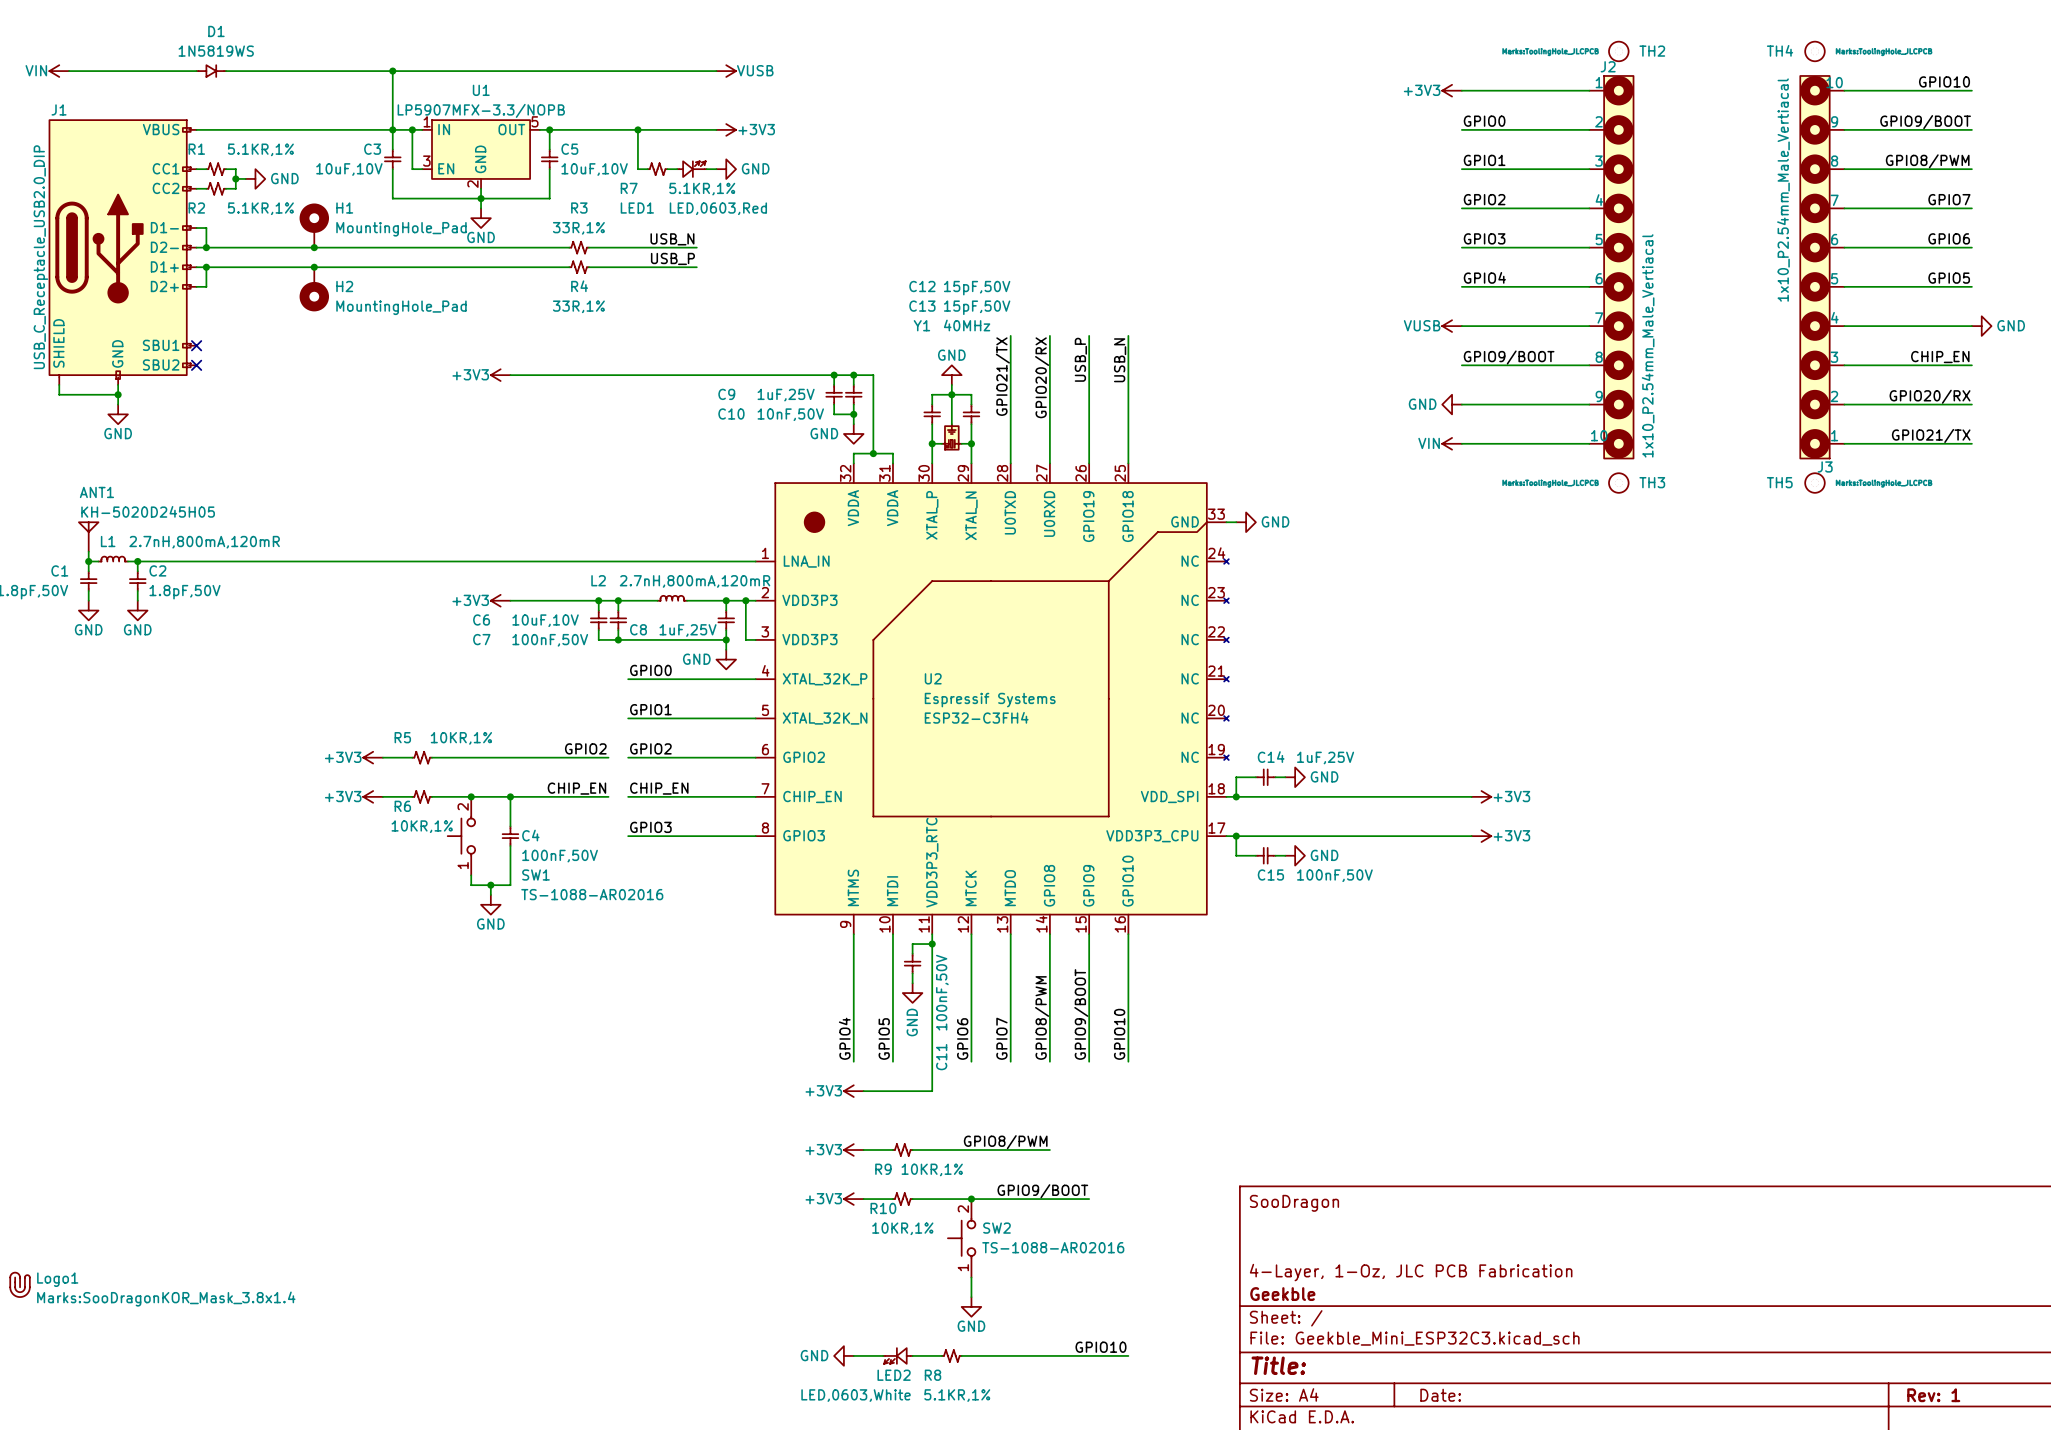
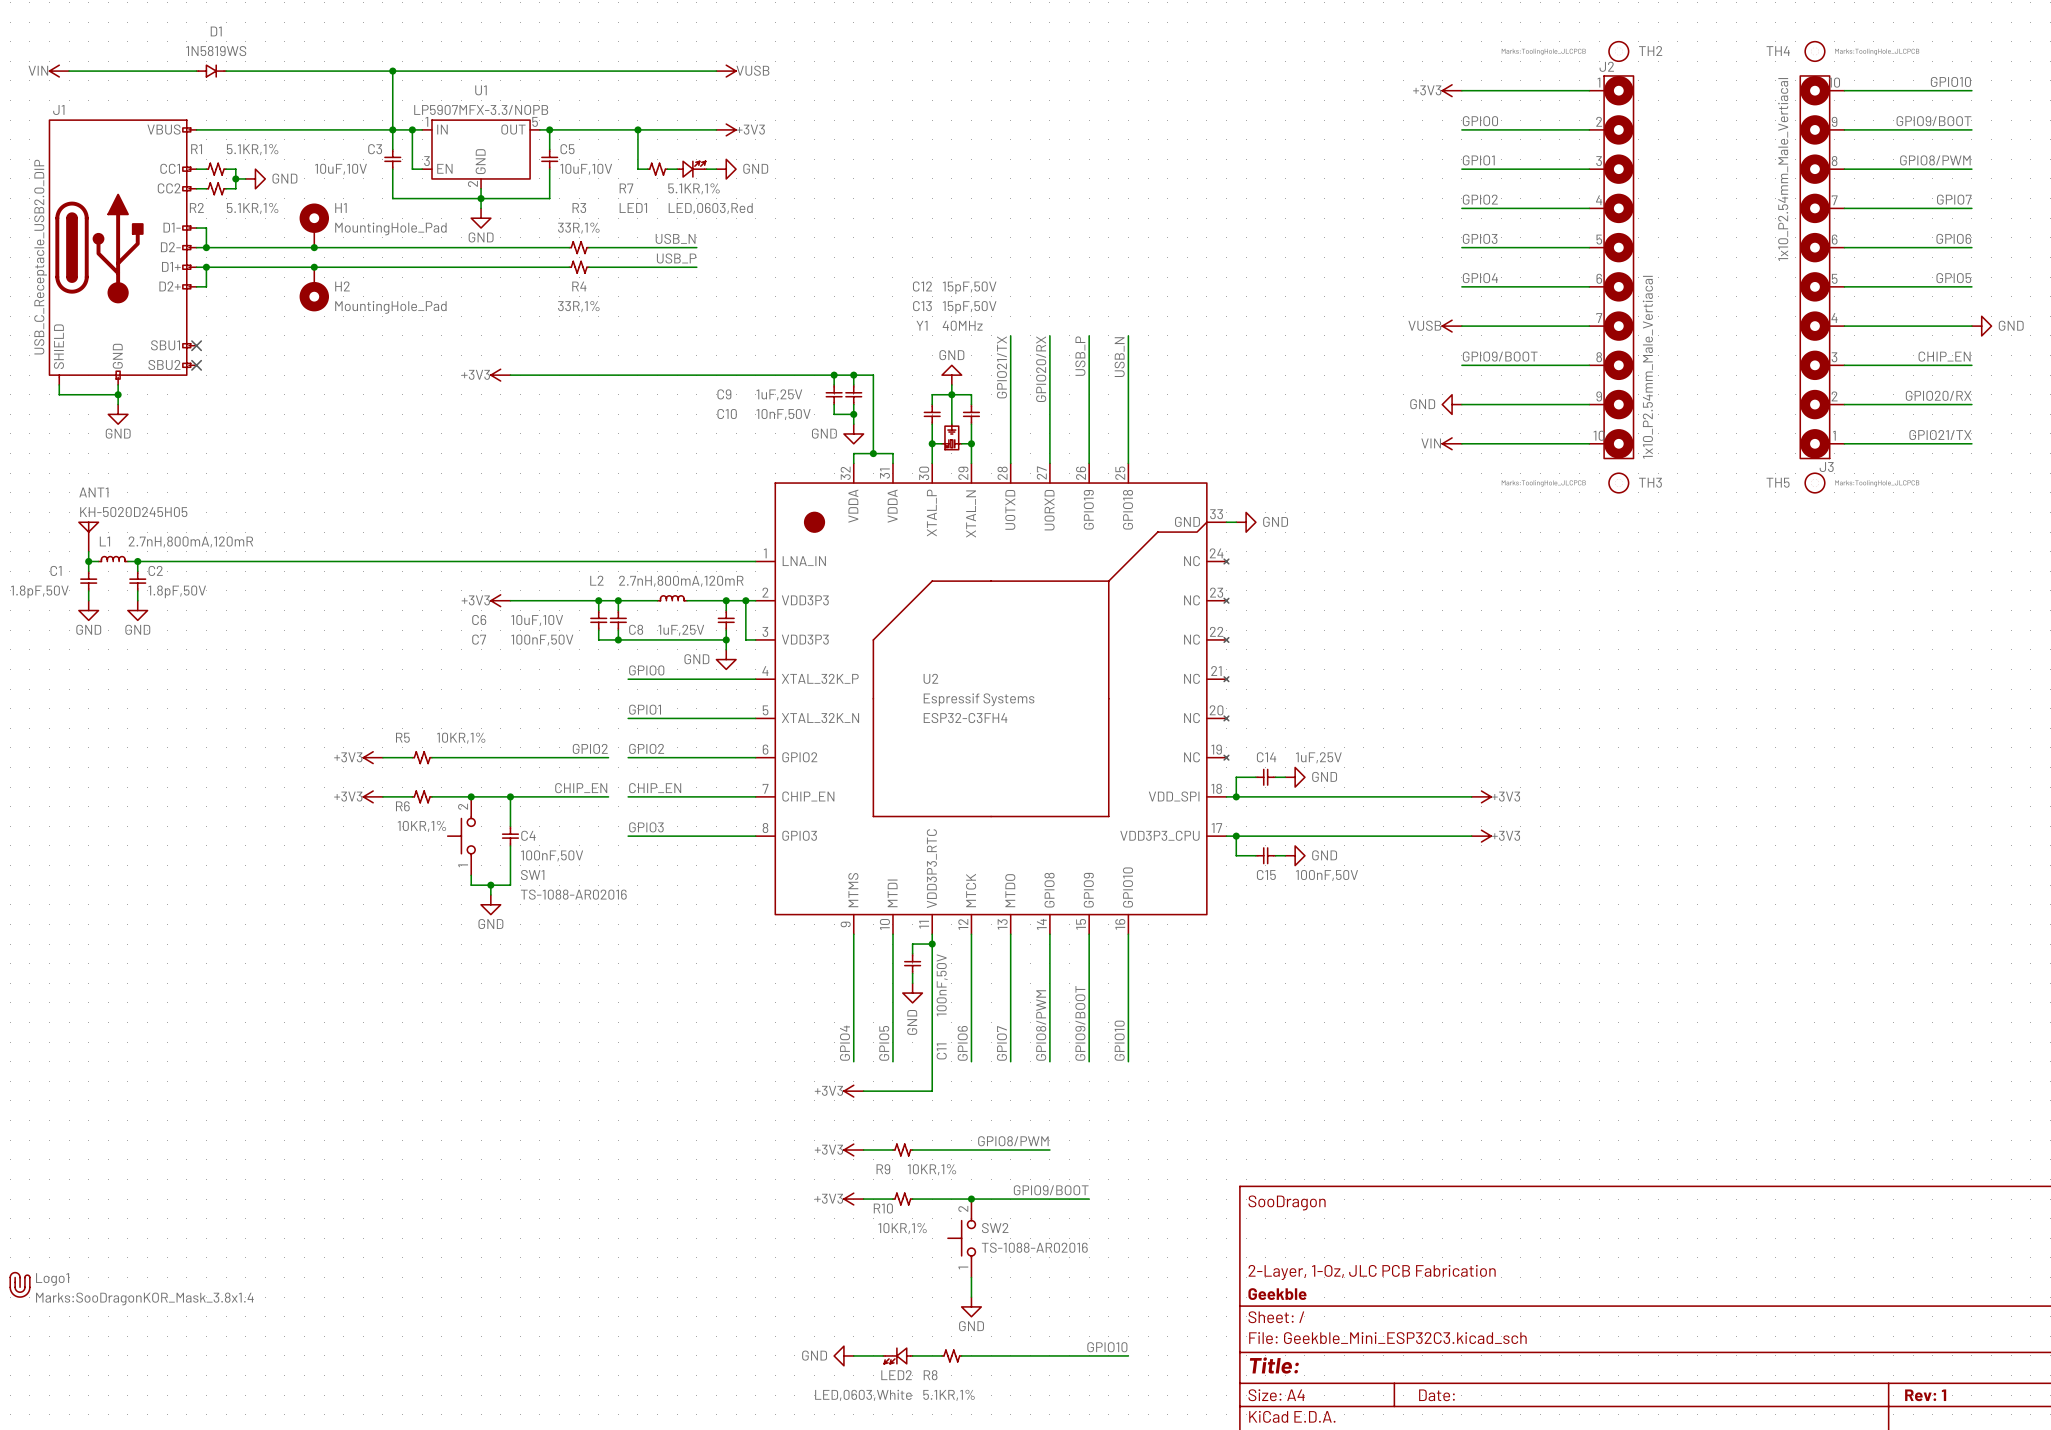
title block: 4-Layer, 1-Oz, JLC PCB Fabrication (1411, 1272) -> 2-Layer, 1-Oz, JLC PCB Fabrication (1372, 1272)

